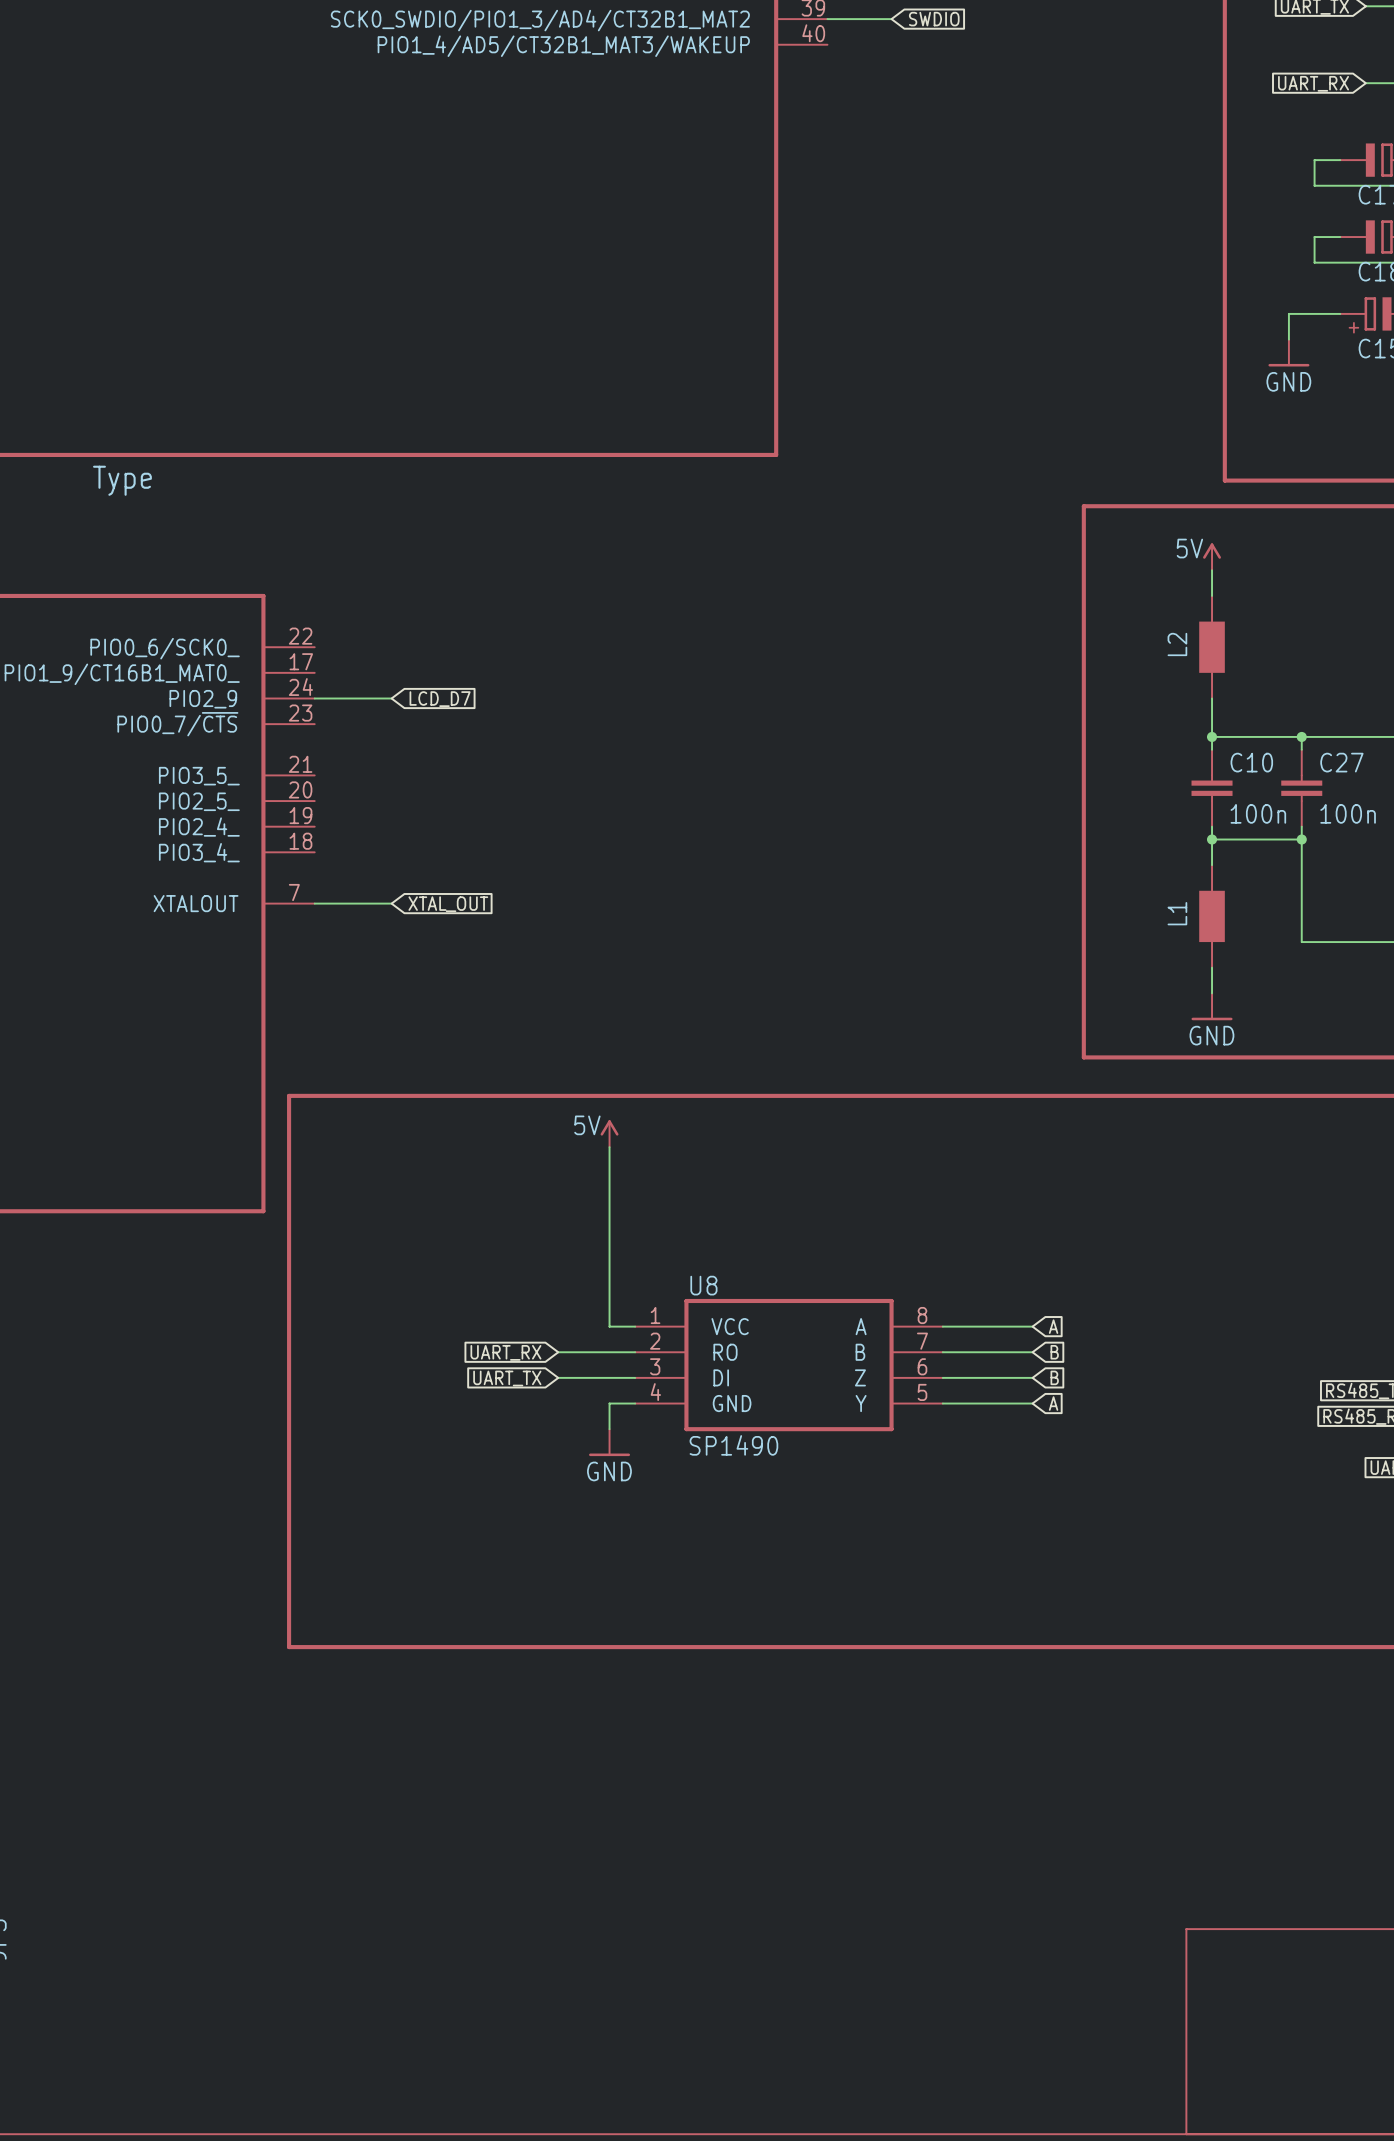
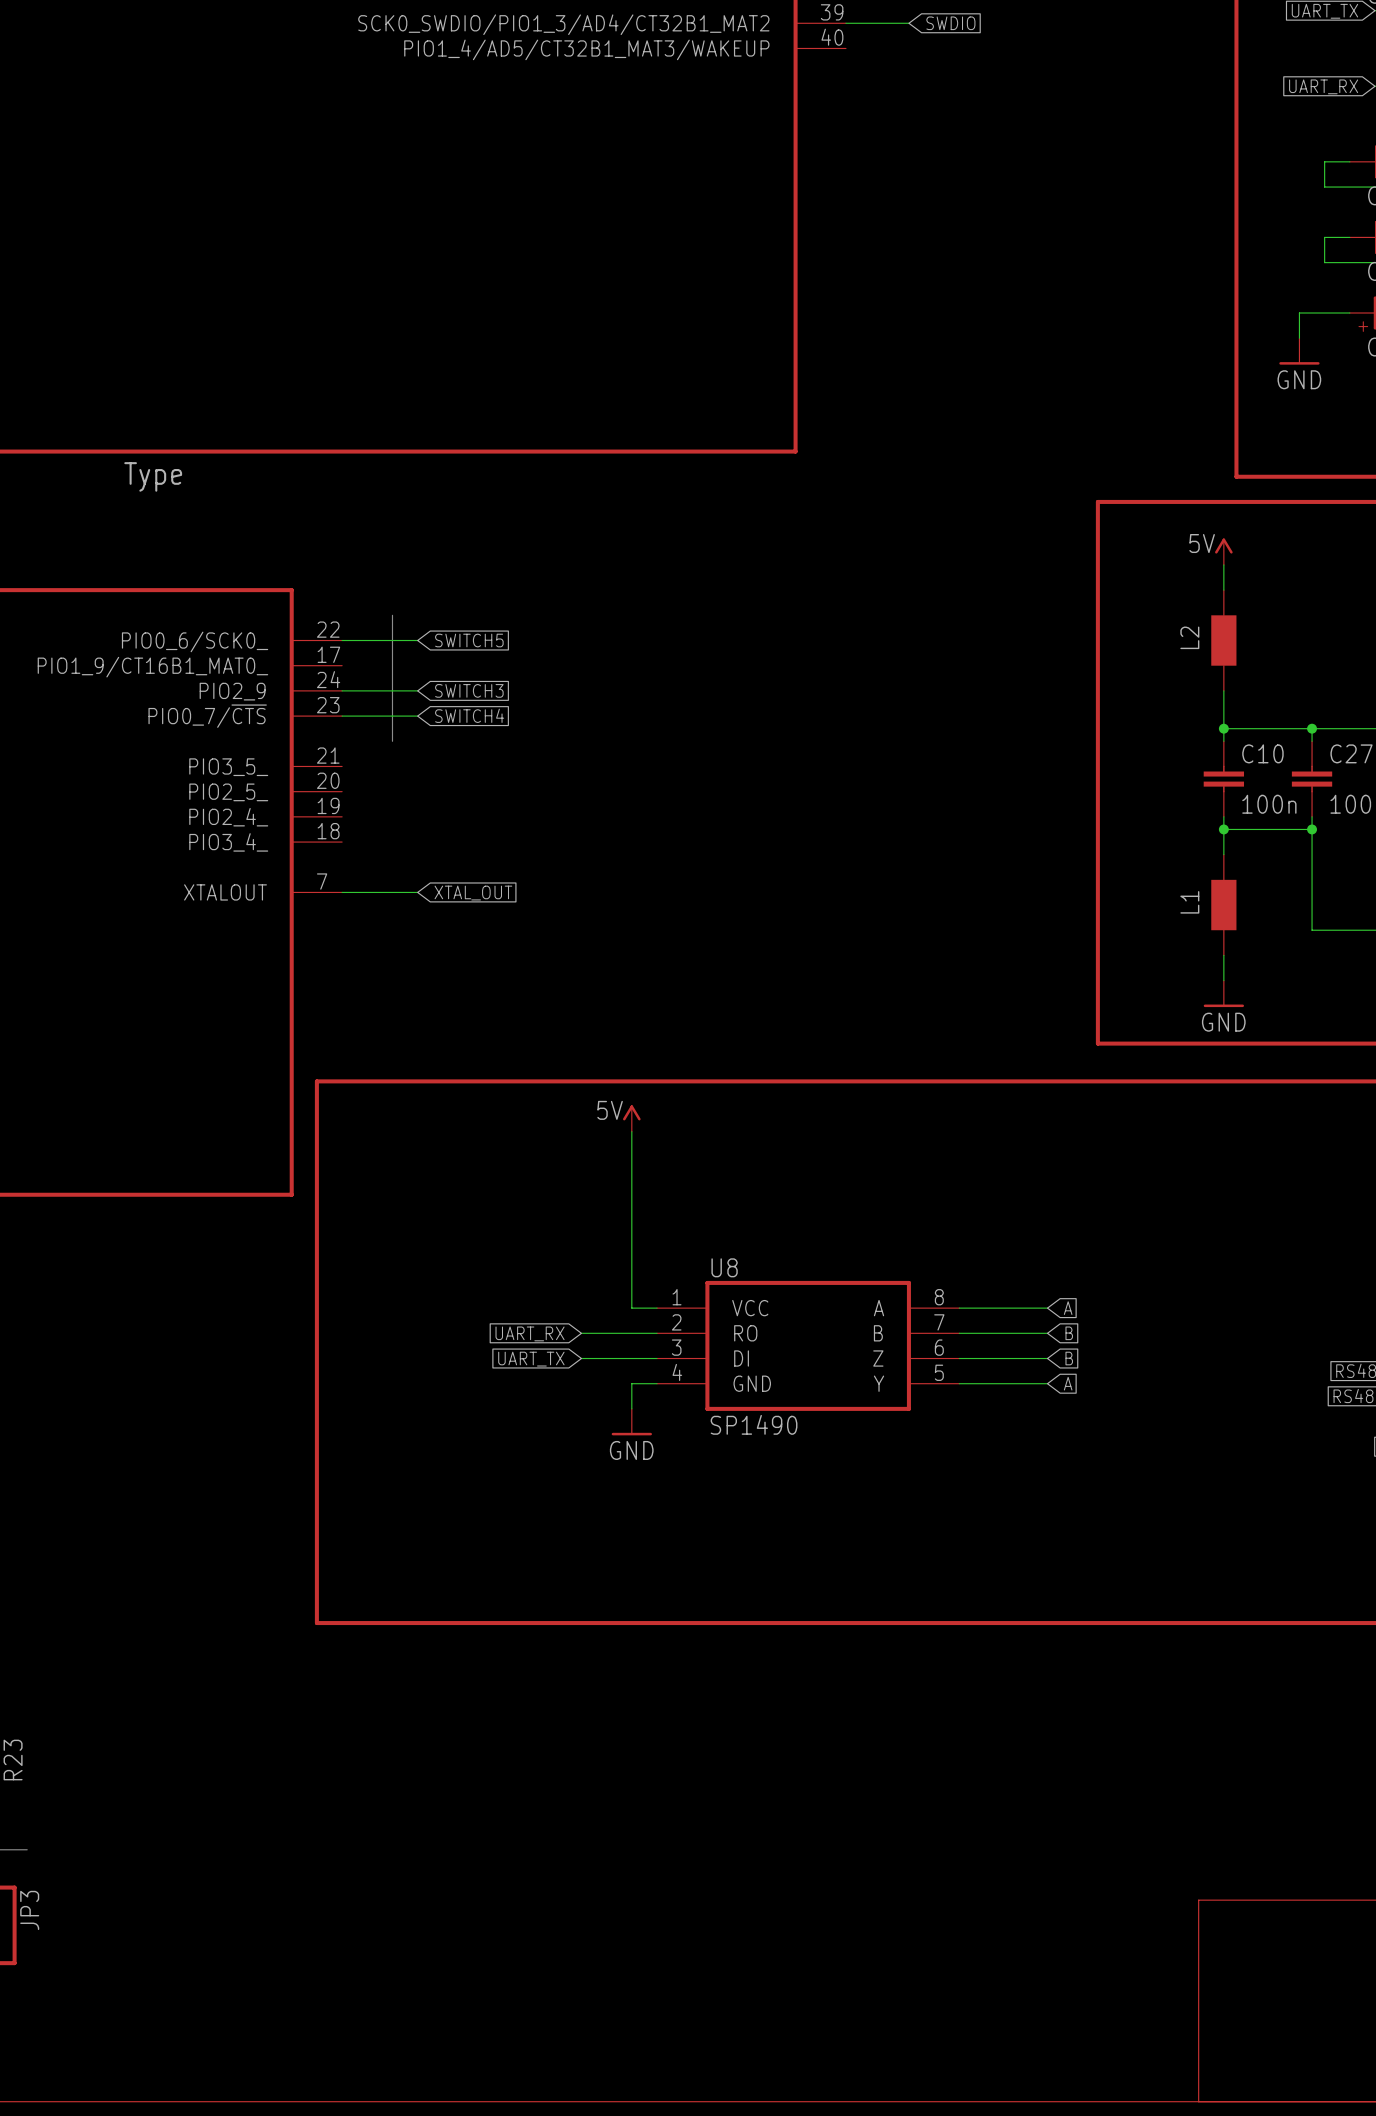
bus: none -> (392, 615) (392, 741)
wire: none -> (342, 640) (417, 640)
global label: none -> SWITCH5 (469, 640)
global label: LCD_D7 (440, 699) -> SWITCH3 (469, 690)
global label: none -> SWITCH4 (469, 715)
wire: none -> (342, 716) (417, 716)

